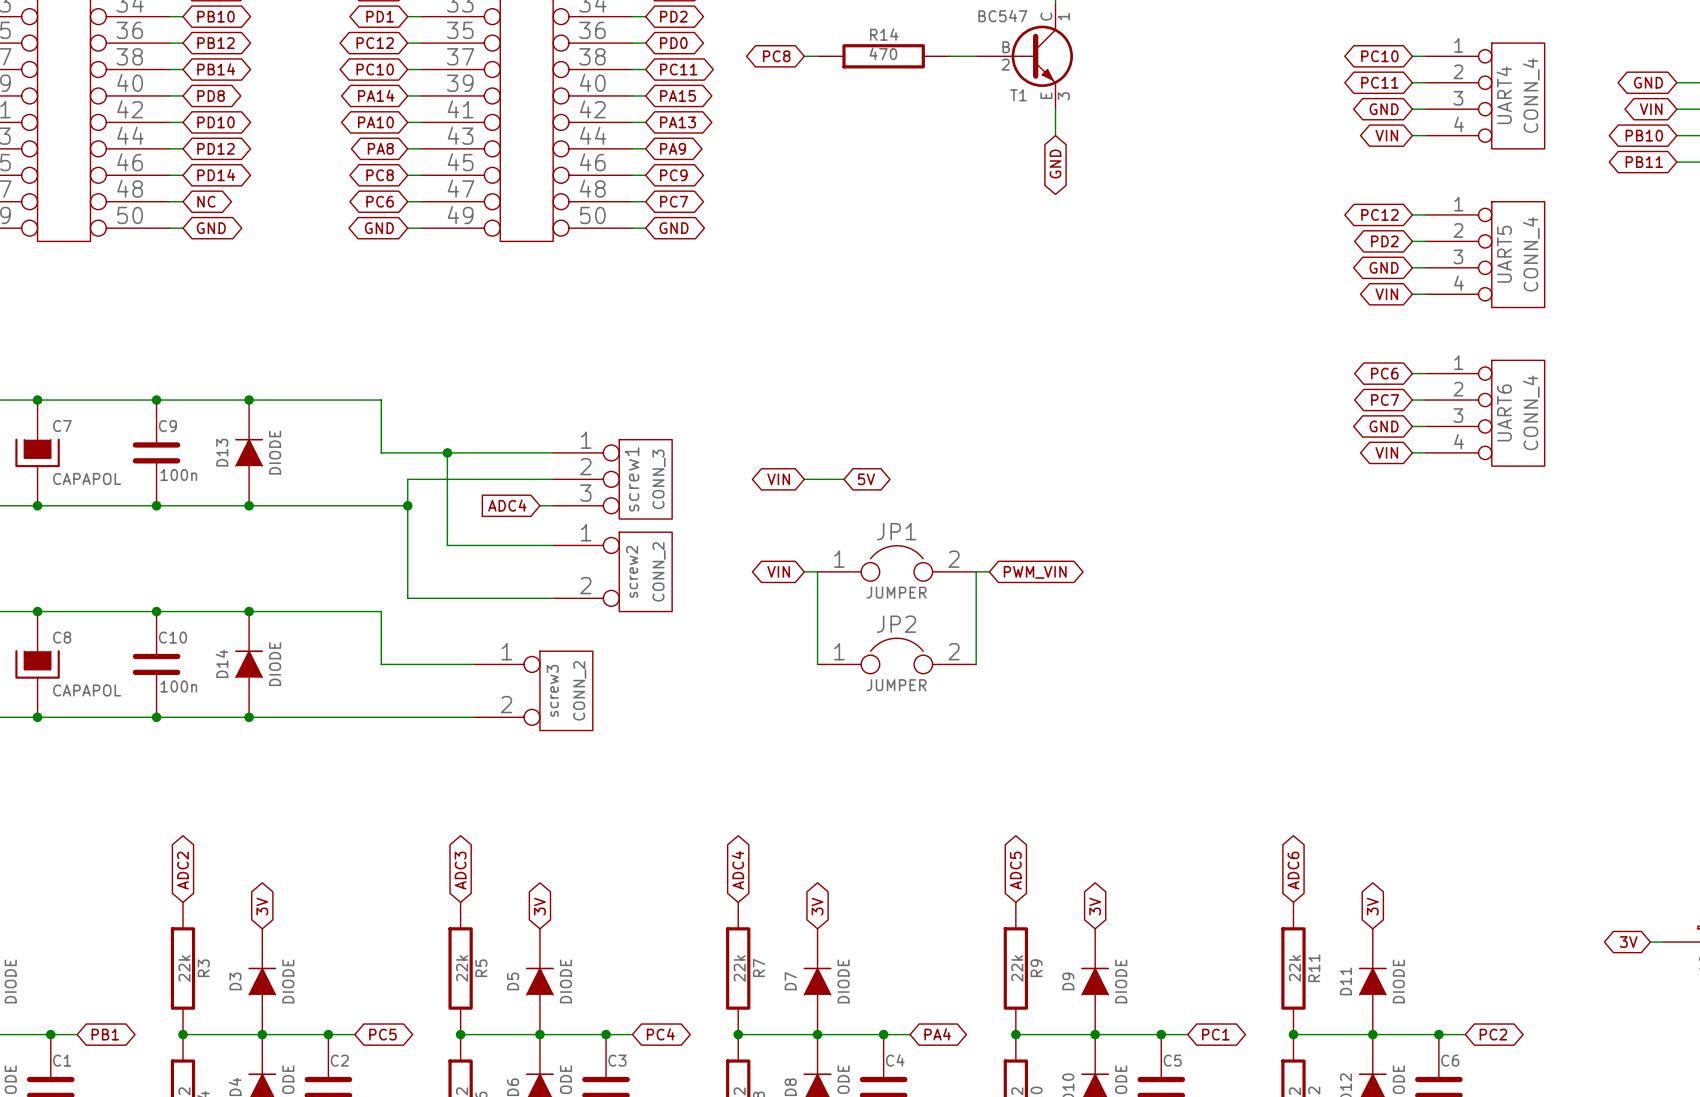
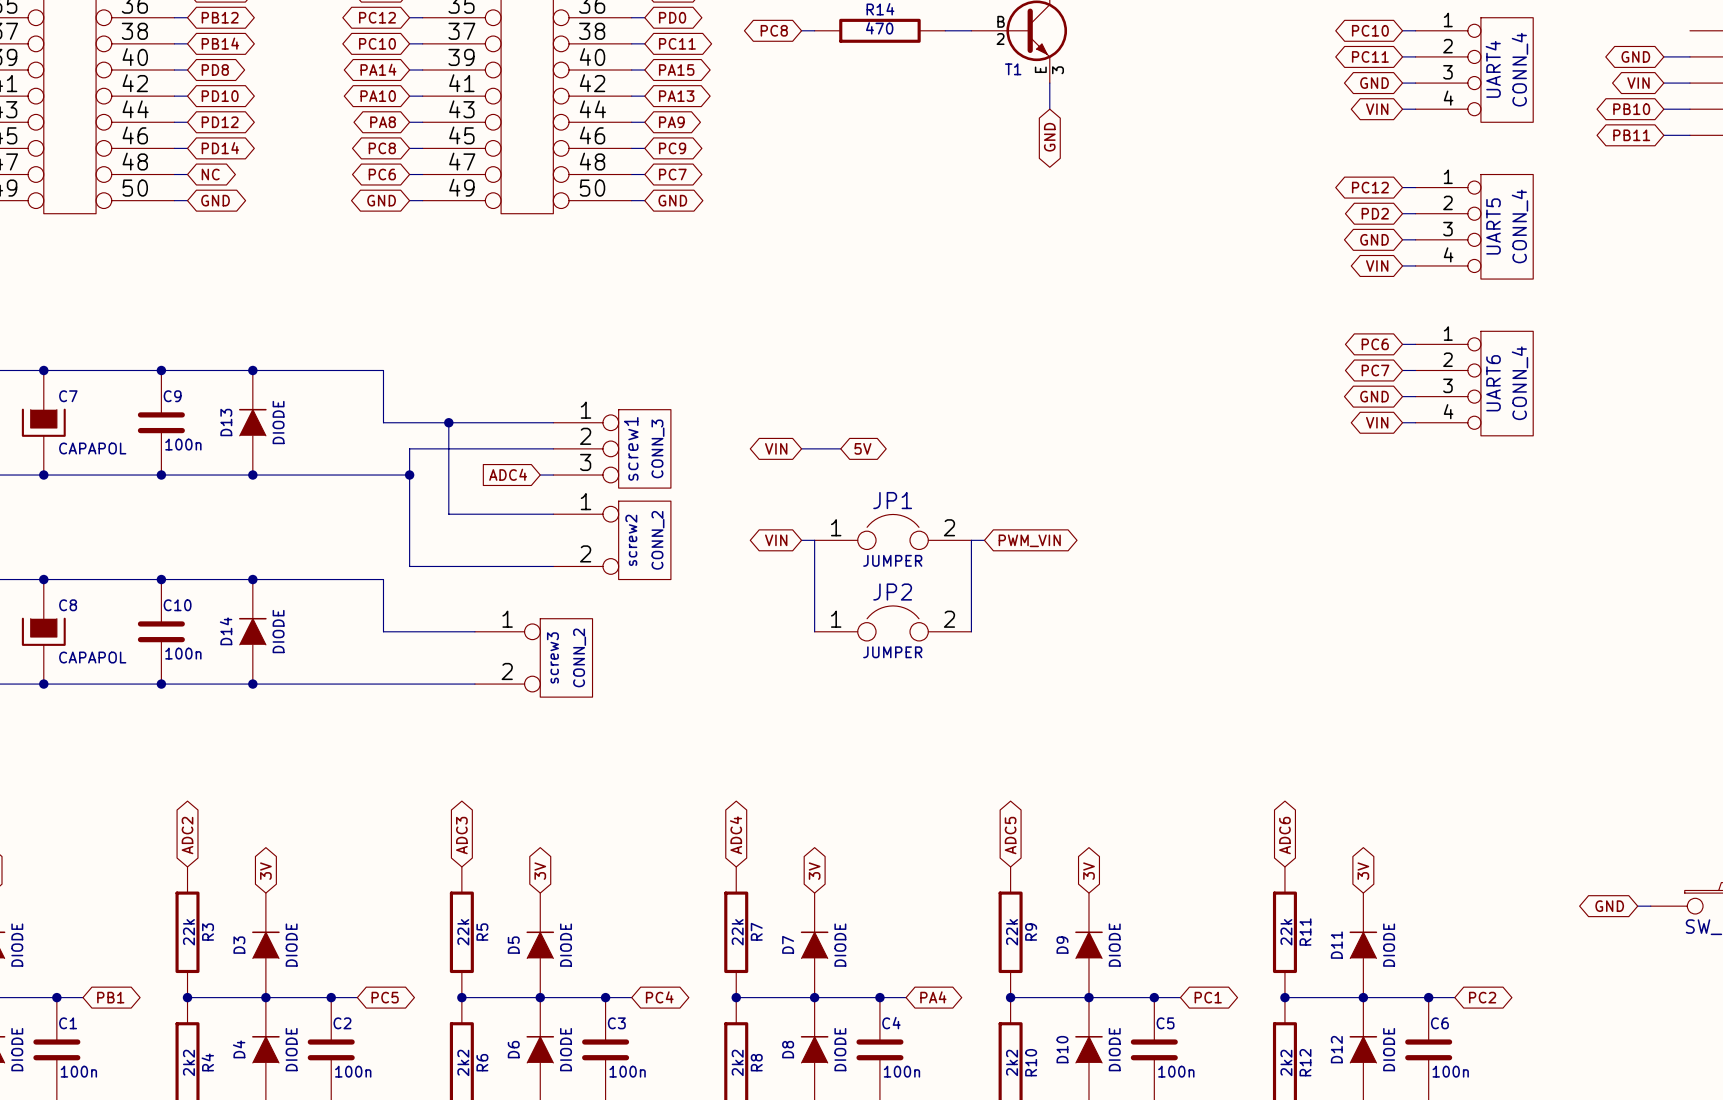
global label: 3V (1628, 942) -> GND (1609, 906)

